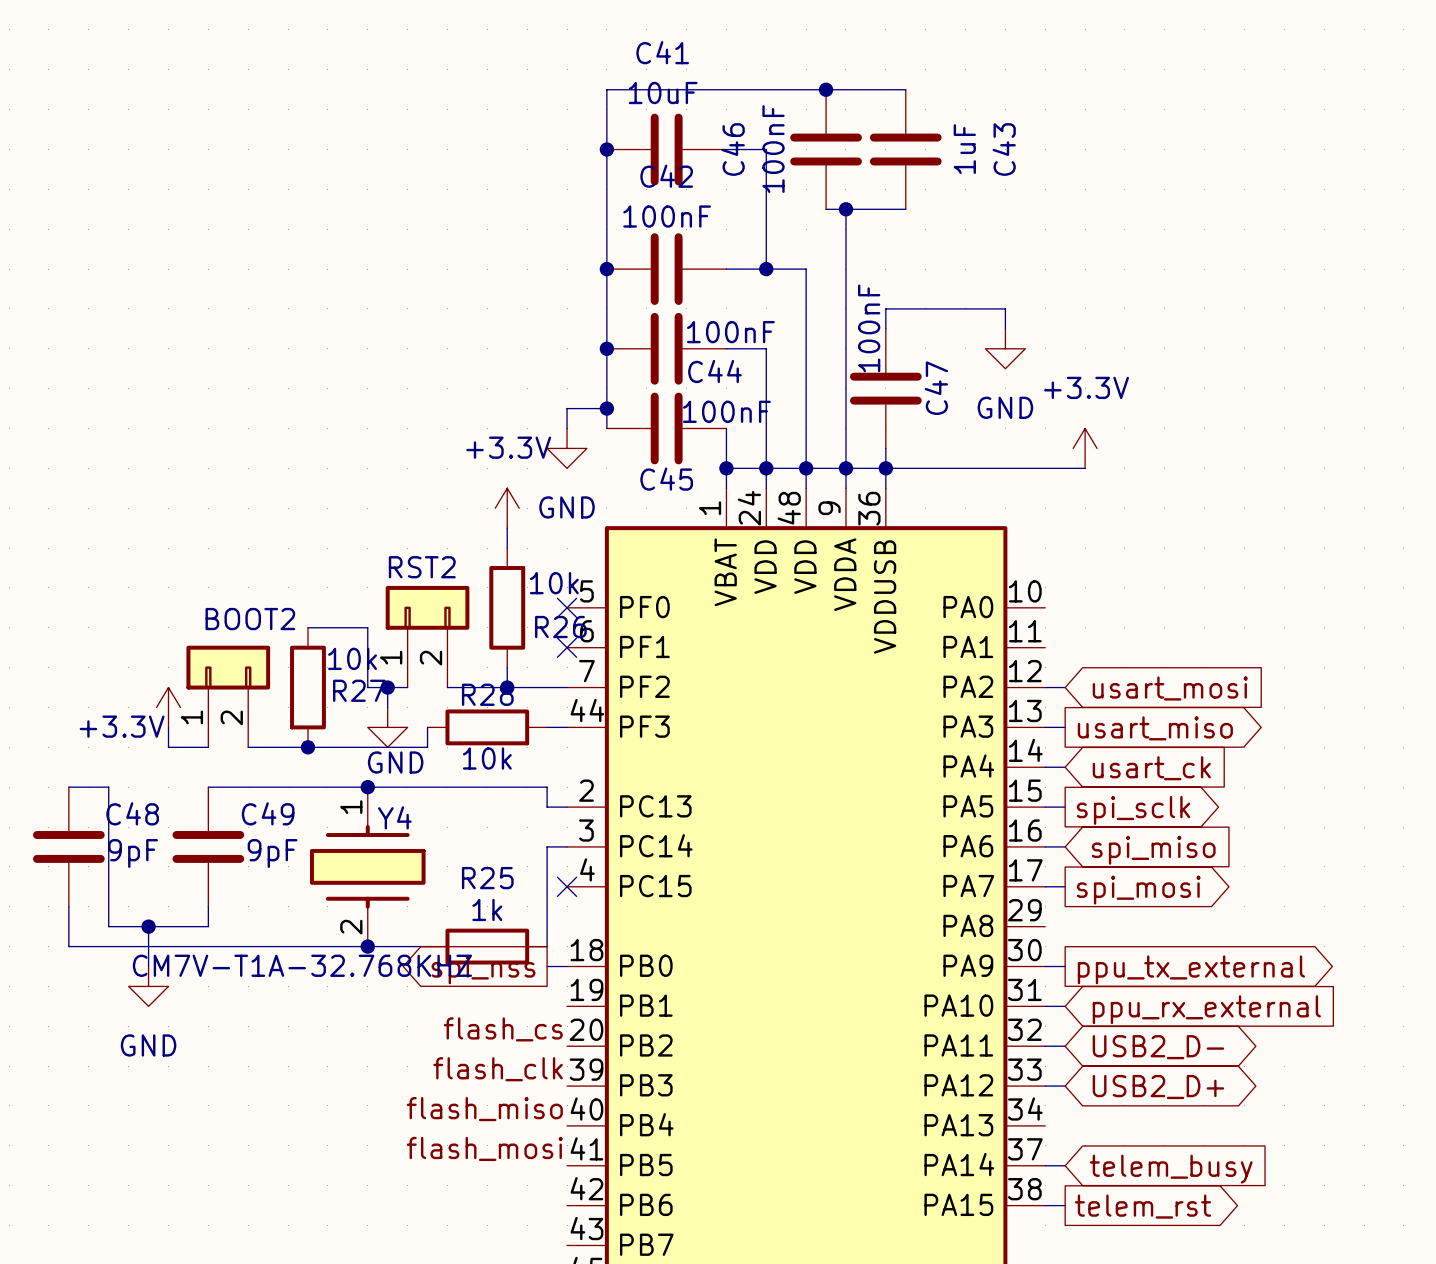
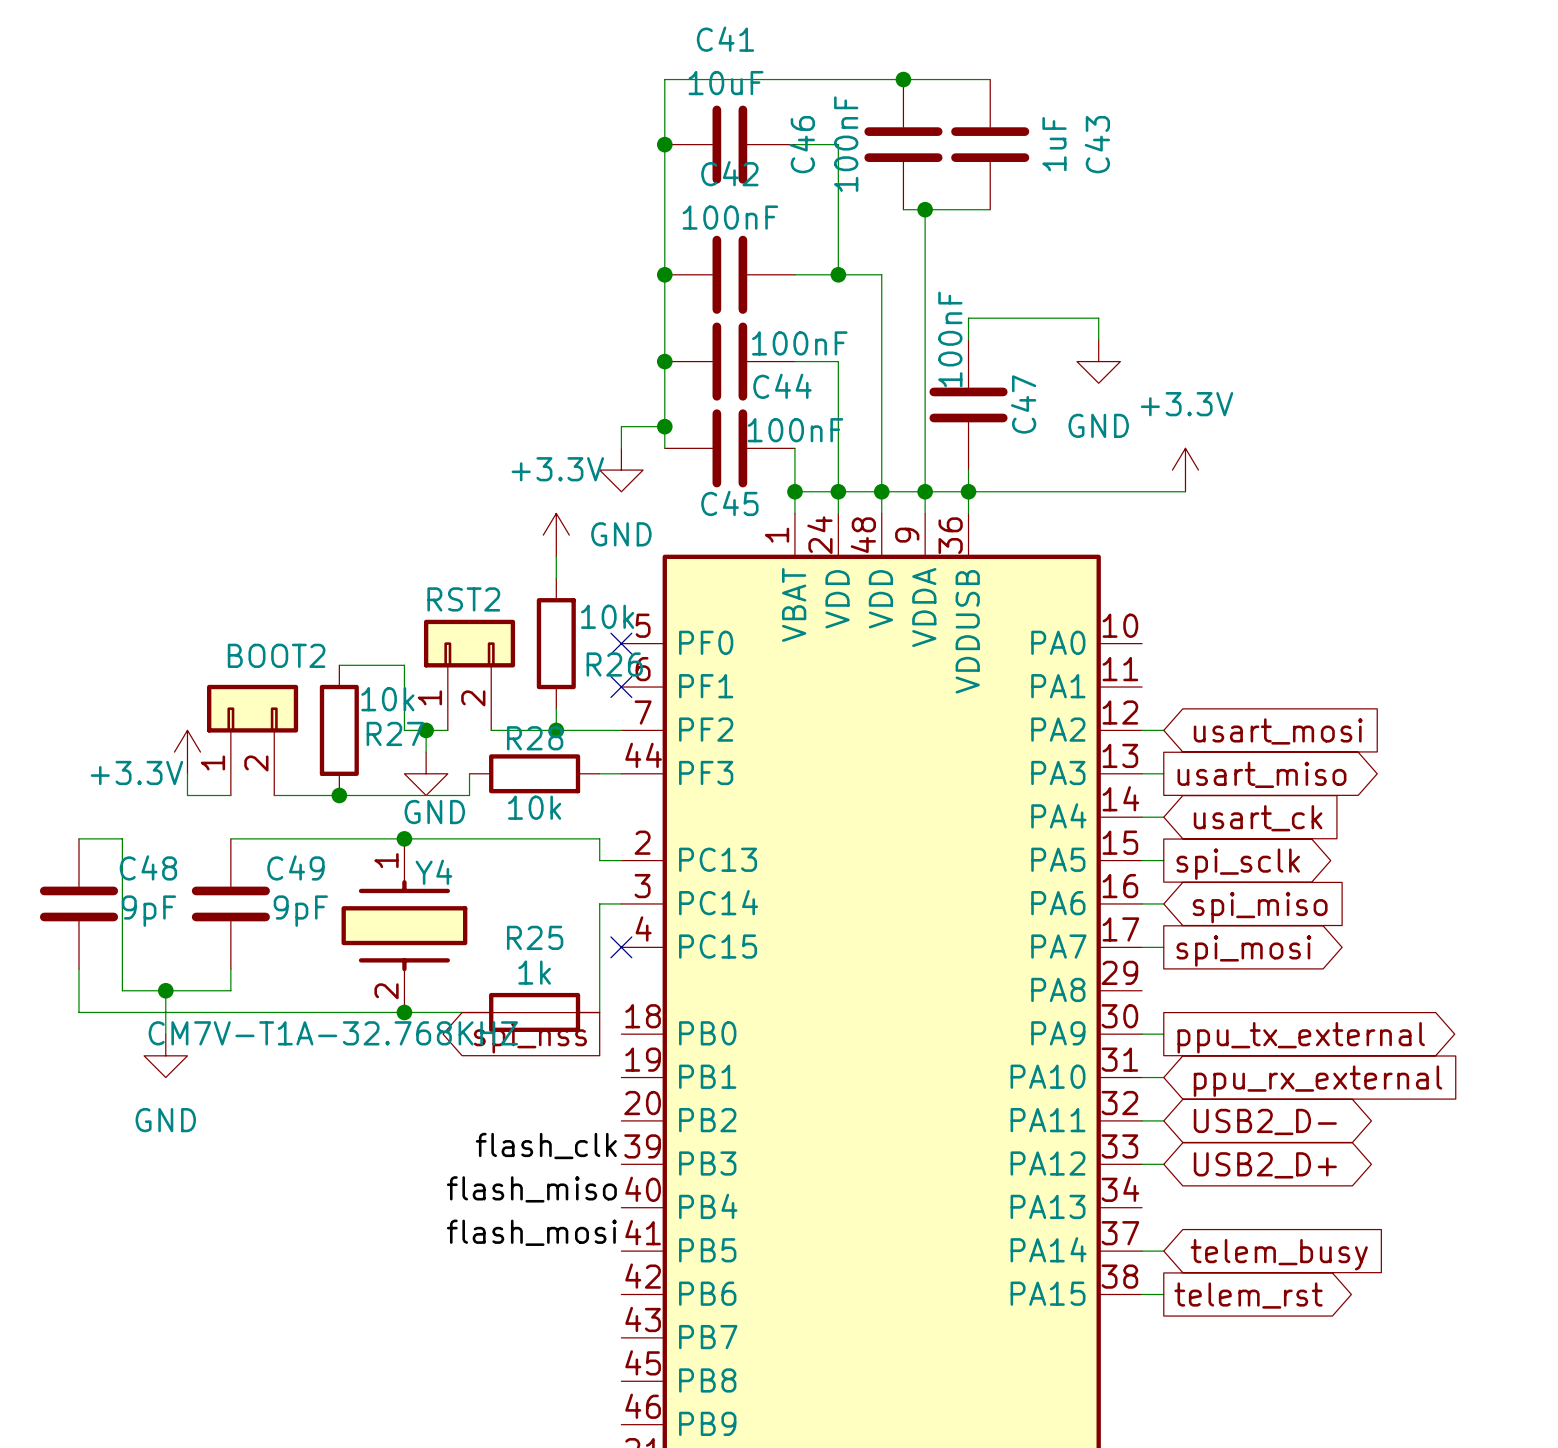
wire: (547, 966) (567, 966) -> none
label: flash_cs (503, 1029) -> none

